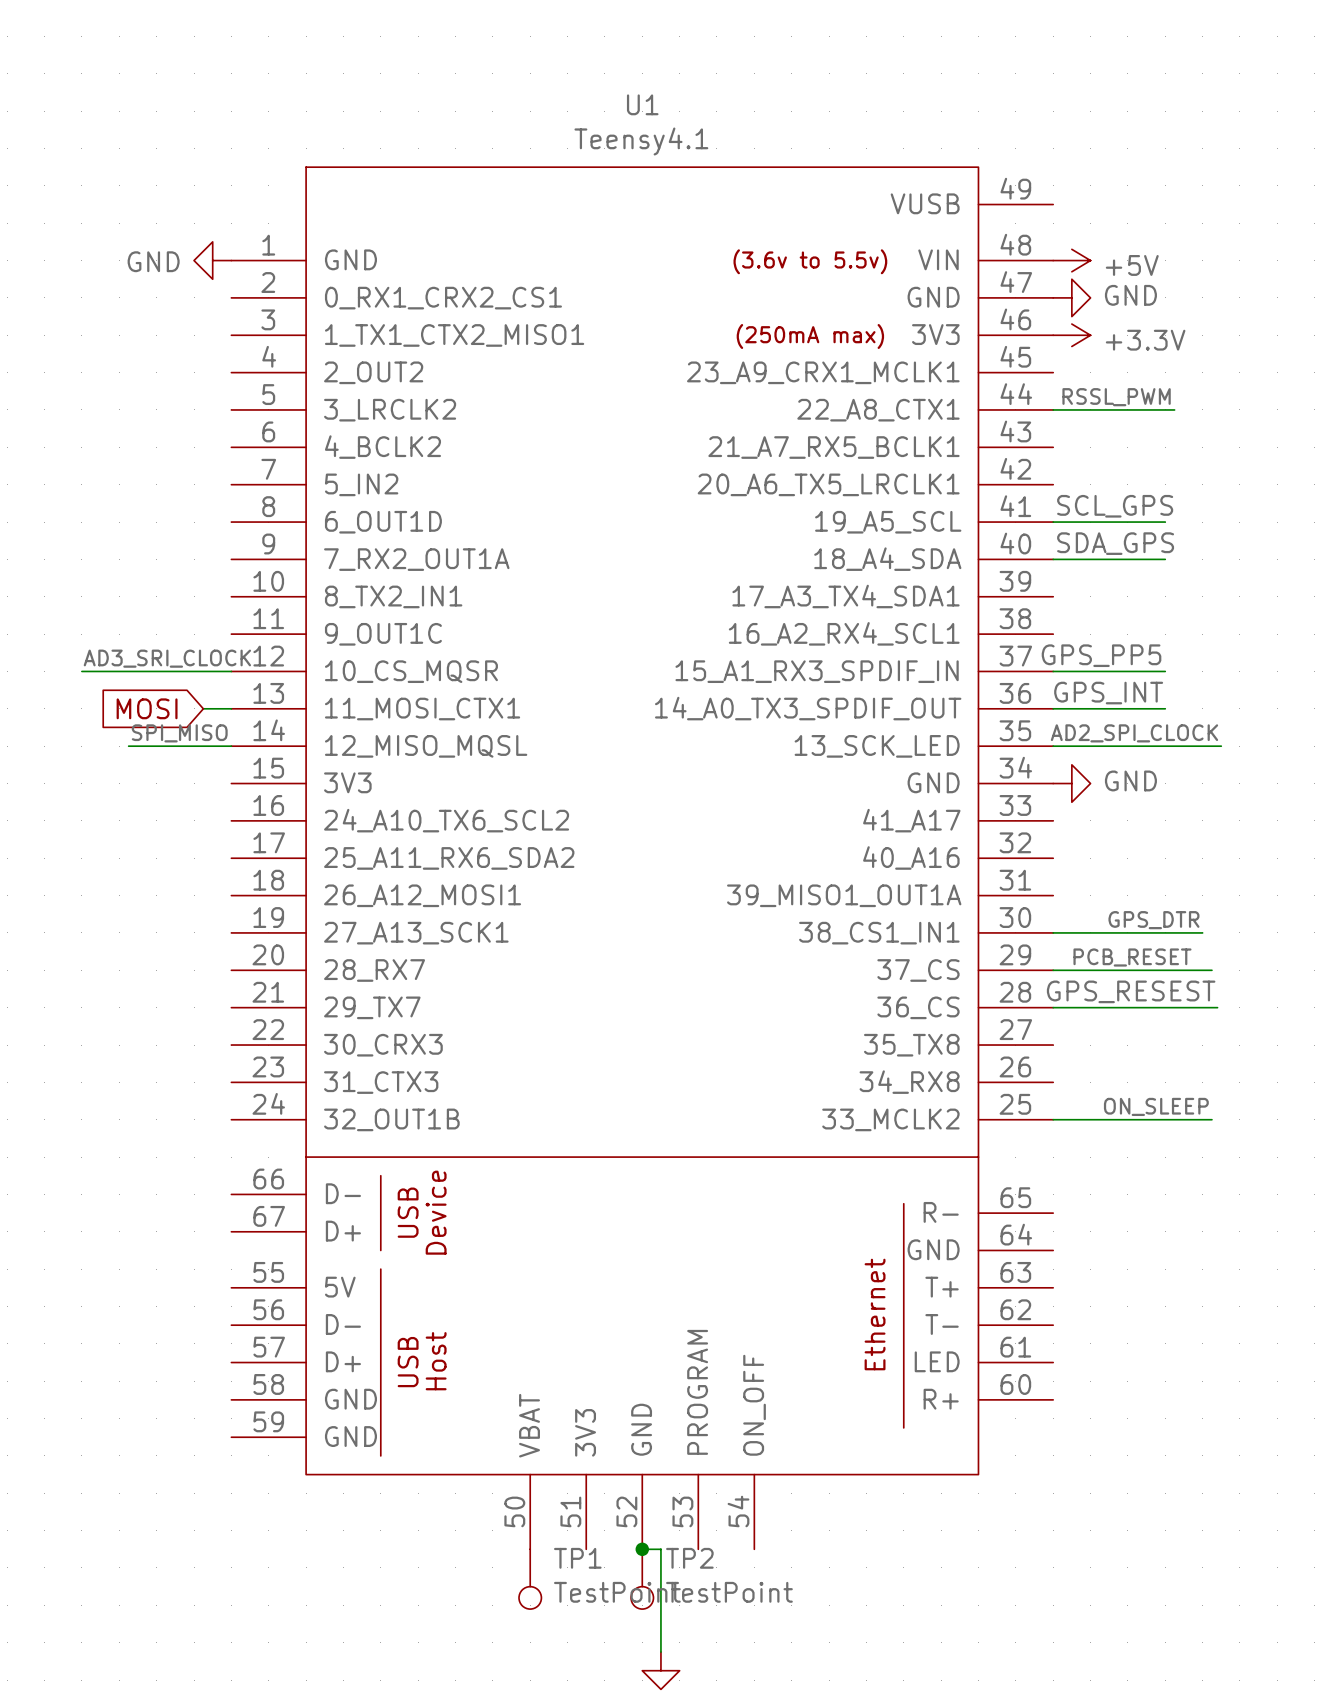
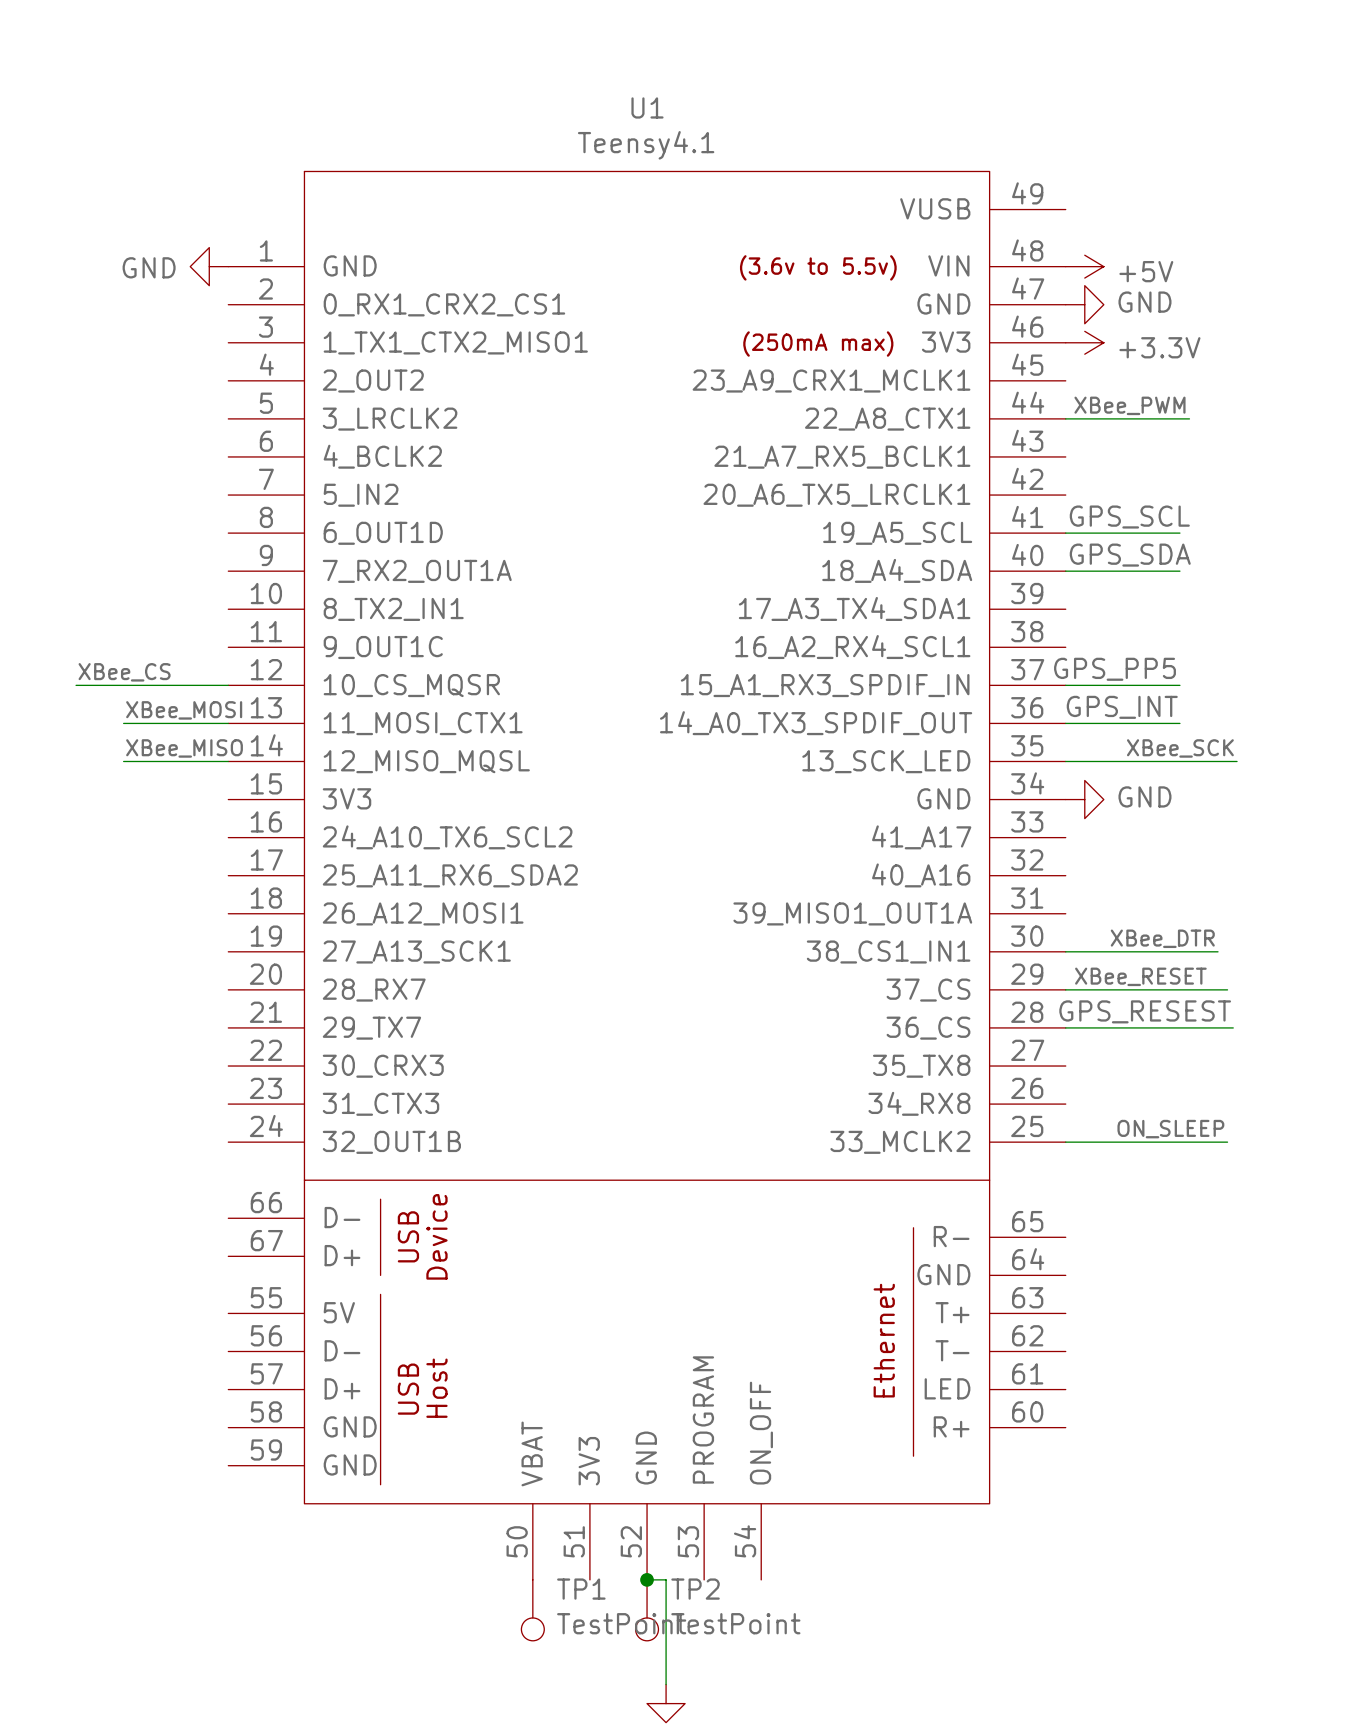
label: RSSL_PWM (1116, 397) -> XBee_PWM (1129, 405)
label: SCL_GPS (1115, 506) -> GPS_SCL (1129, 517)
label: SDA_GPS (1115, 543) -> GPS_SDA (1130, 555)
label: AD3_SRI_CLOCK (167, 658) -> XBee_CS (124, 672)
label: none -> XBee_MOSI (184, 710)
wire: none -> (123, 723) (199, 723)
global label: MOSI (147, 708) -> none
label: SPI_MISO (179, 733) -> XBee_MISO (184, 748)
label: AD2_SPI_CLOCK (1134, 733) -> XBee_SCK (1180, 748)
label: GPS_DTR (1153, 920) -> XBee_DTR (1162, 938)
label: PCB_RESET (1132, 957) -> XBee_RESET (1140, 976)

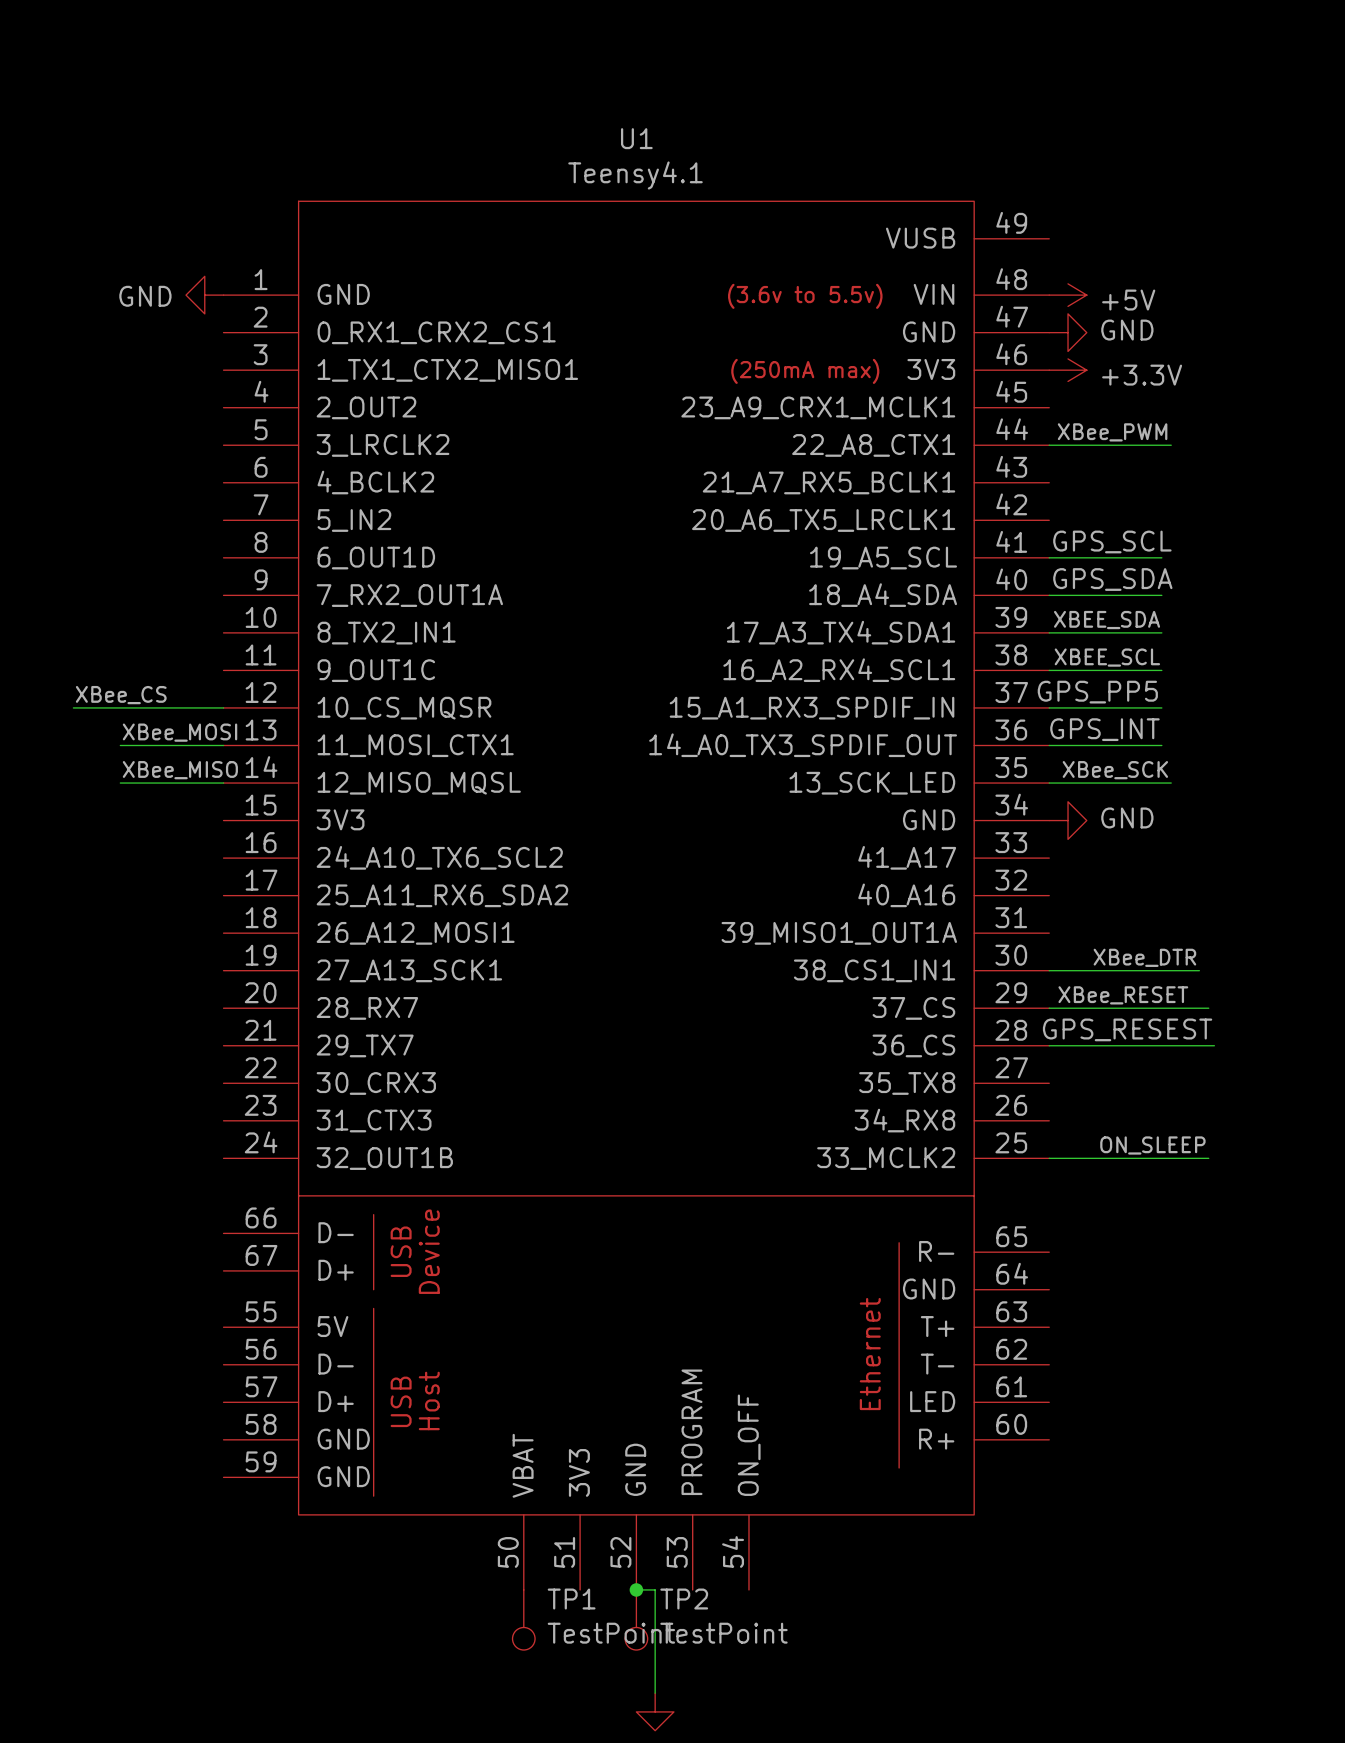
label: none -> XBEE_SDA (1107, 620)
wire: none -> (1049, 632) (1161, 632)
label: none -> XBEE_SCL (1107, 657)
wire: none -> (1049, 670) (1161, 670)
label position: XBee_SCK (1180, 748) -> XBee_SCK (1115, 770)
wire: (1189, 761) (1237, 761) -> none

